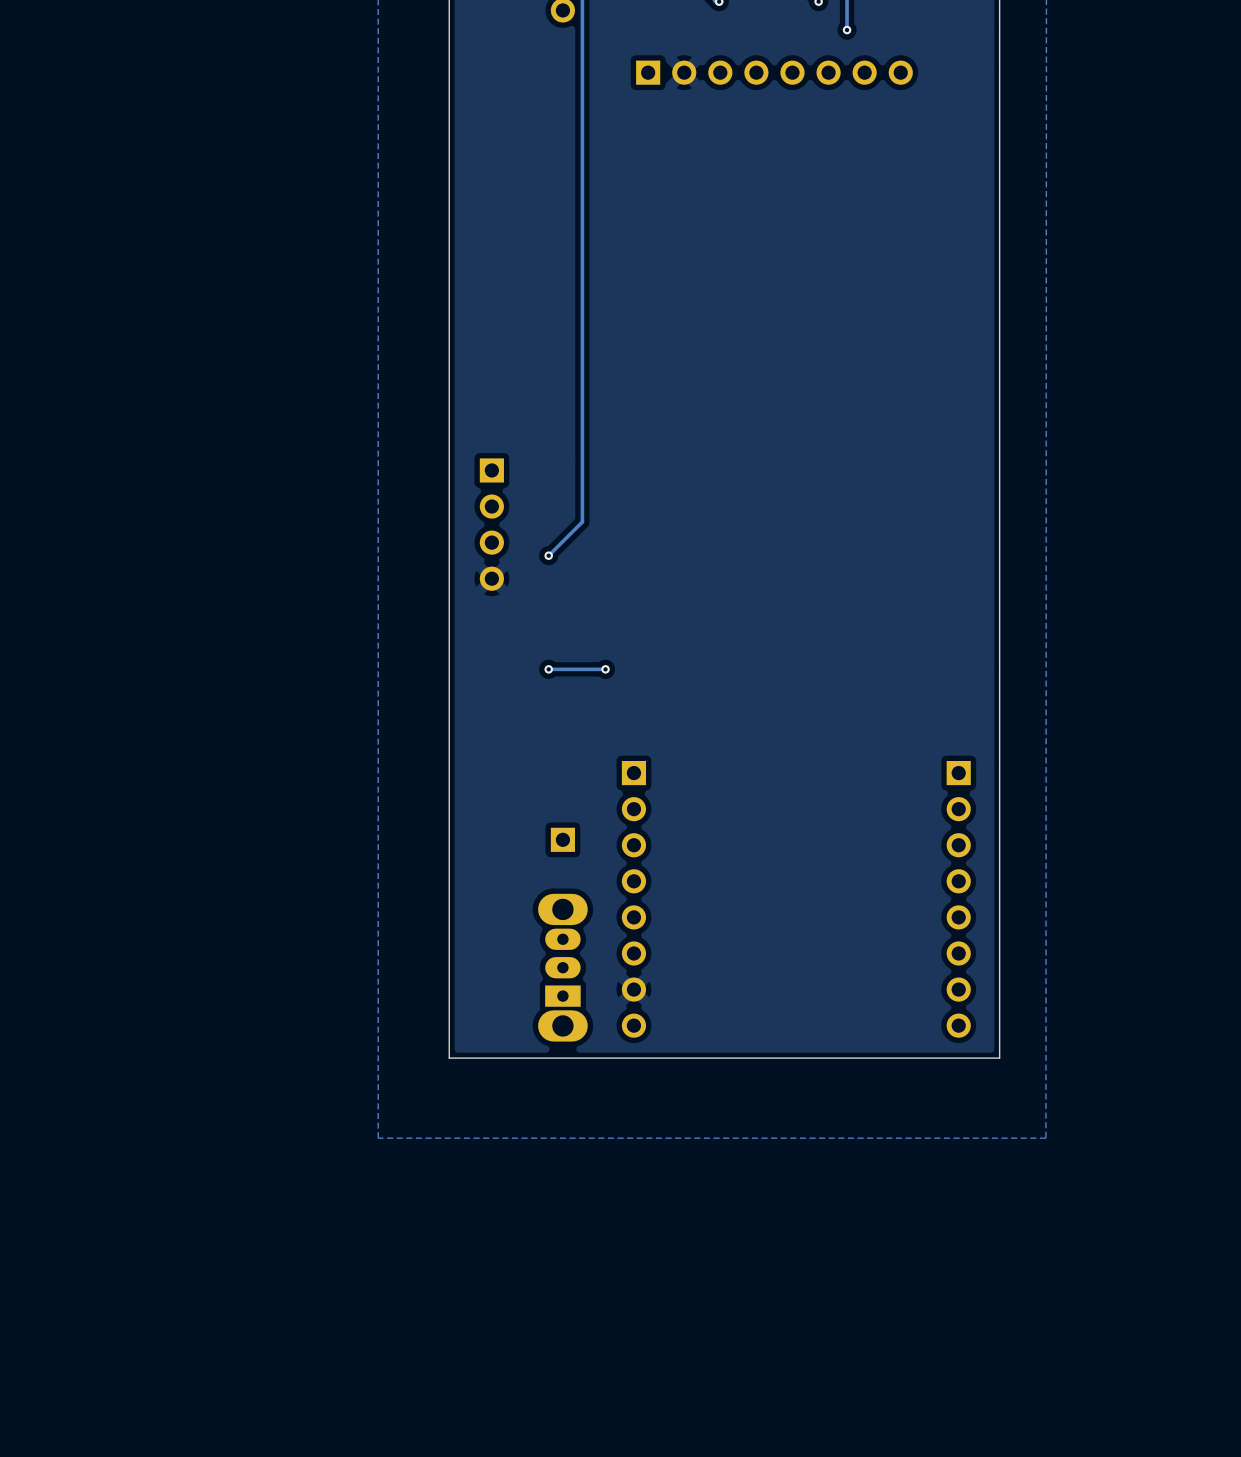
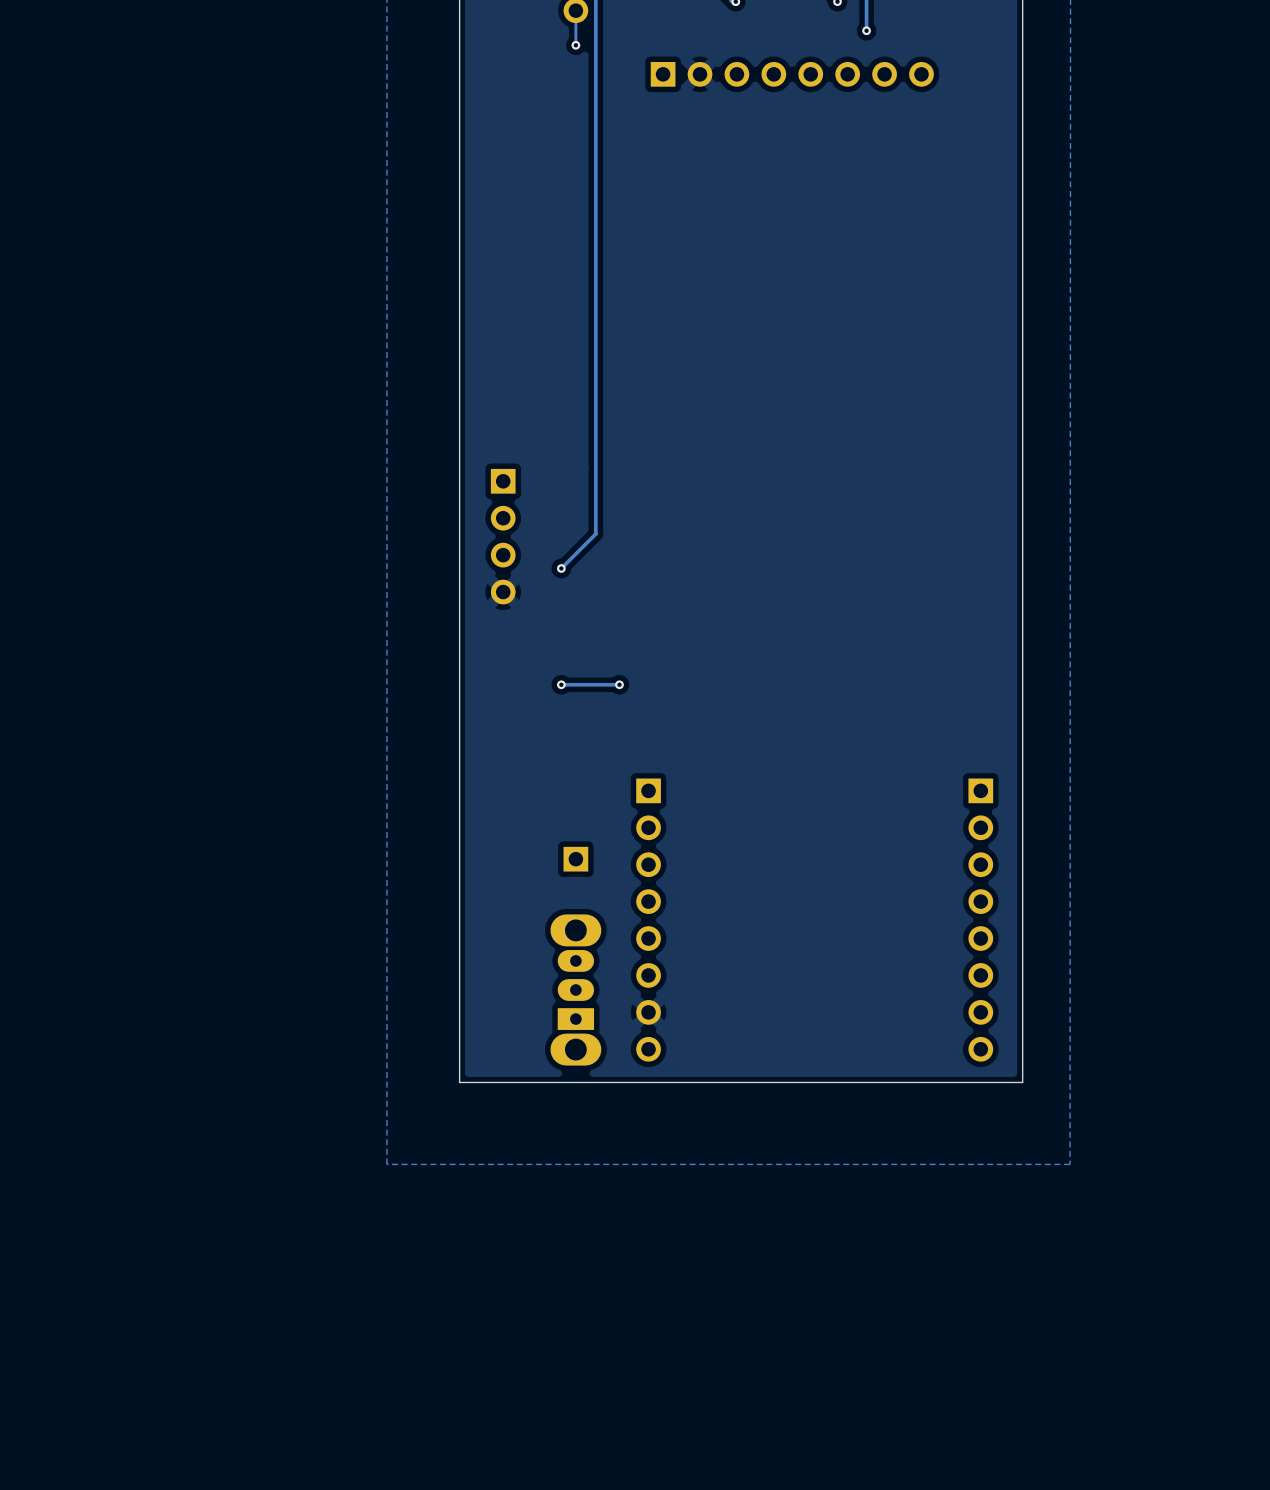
track: none -> (575, 10) (575, 45)
via: none -> (575, 45)

